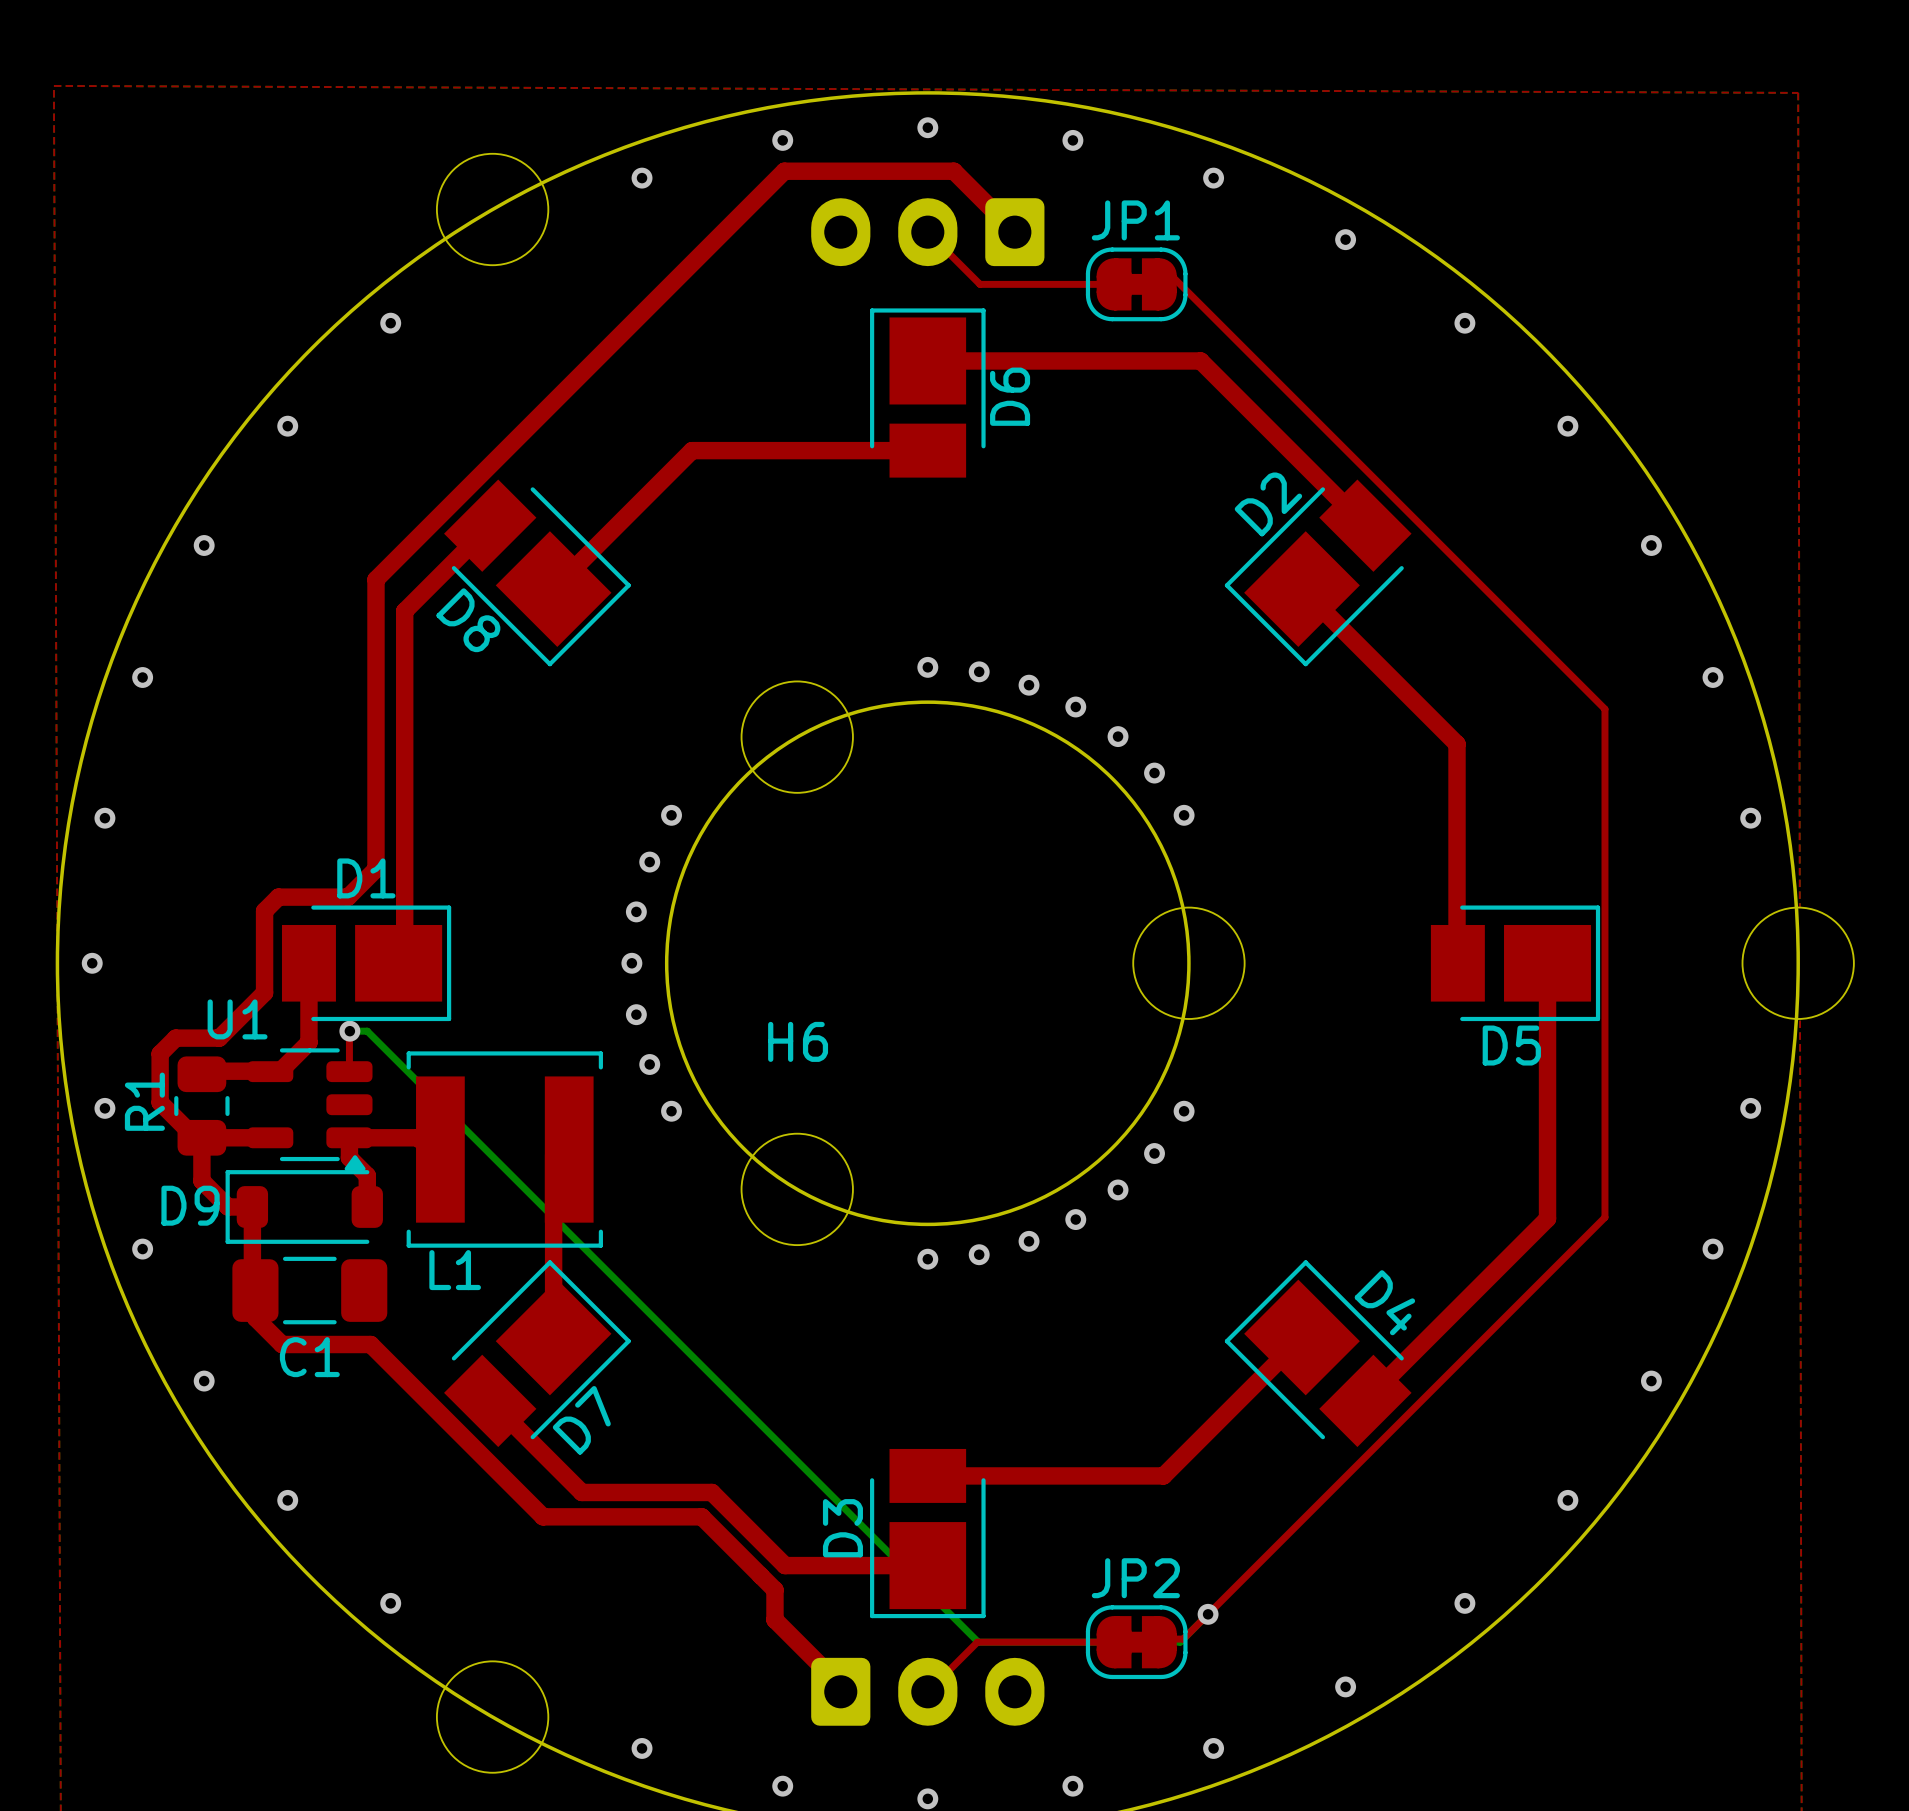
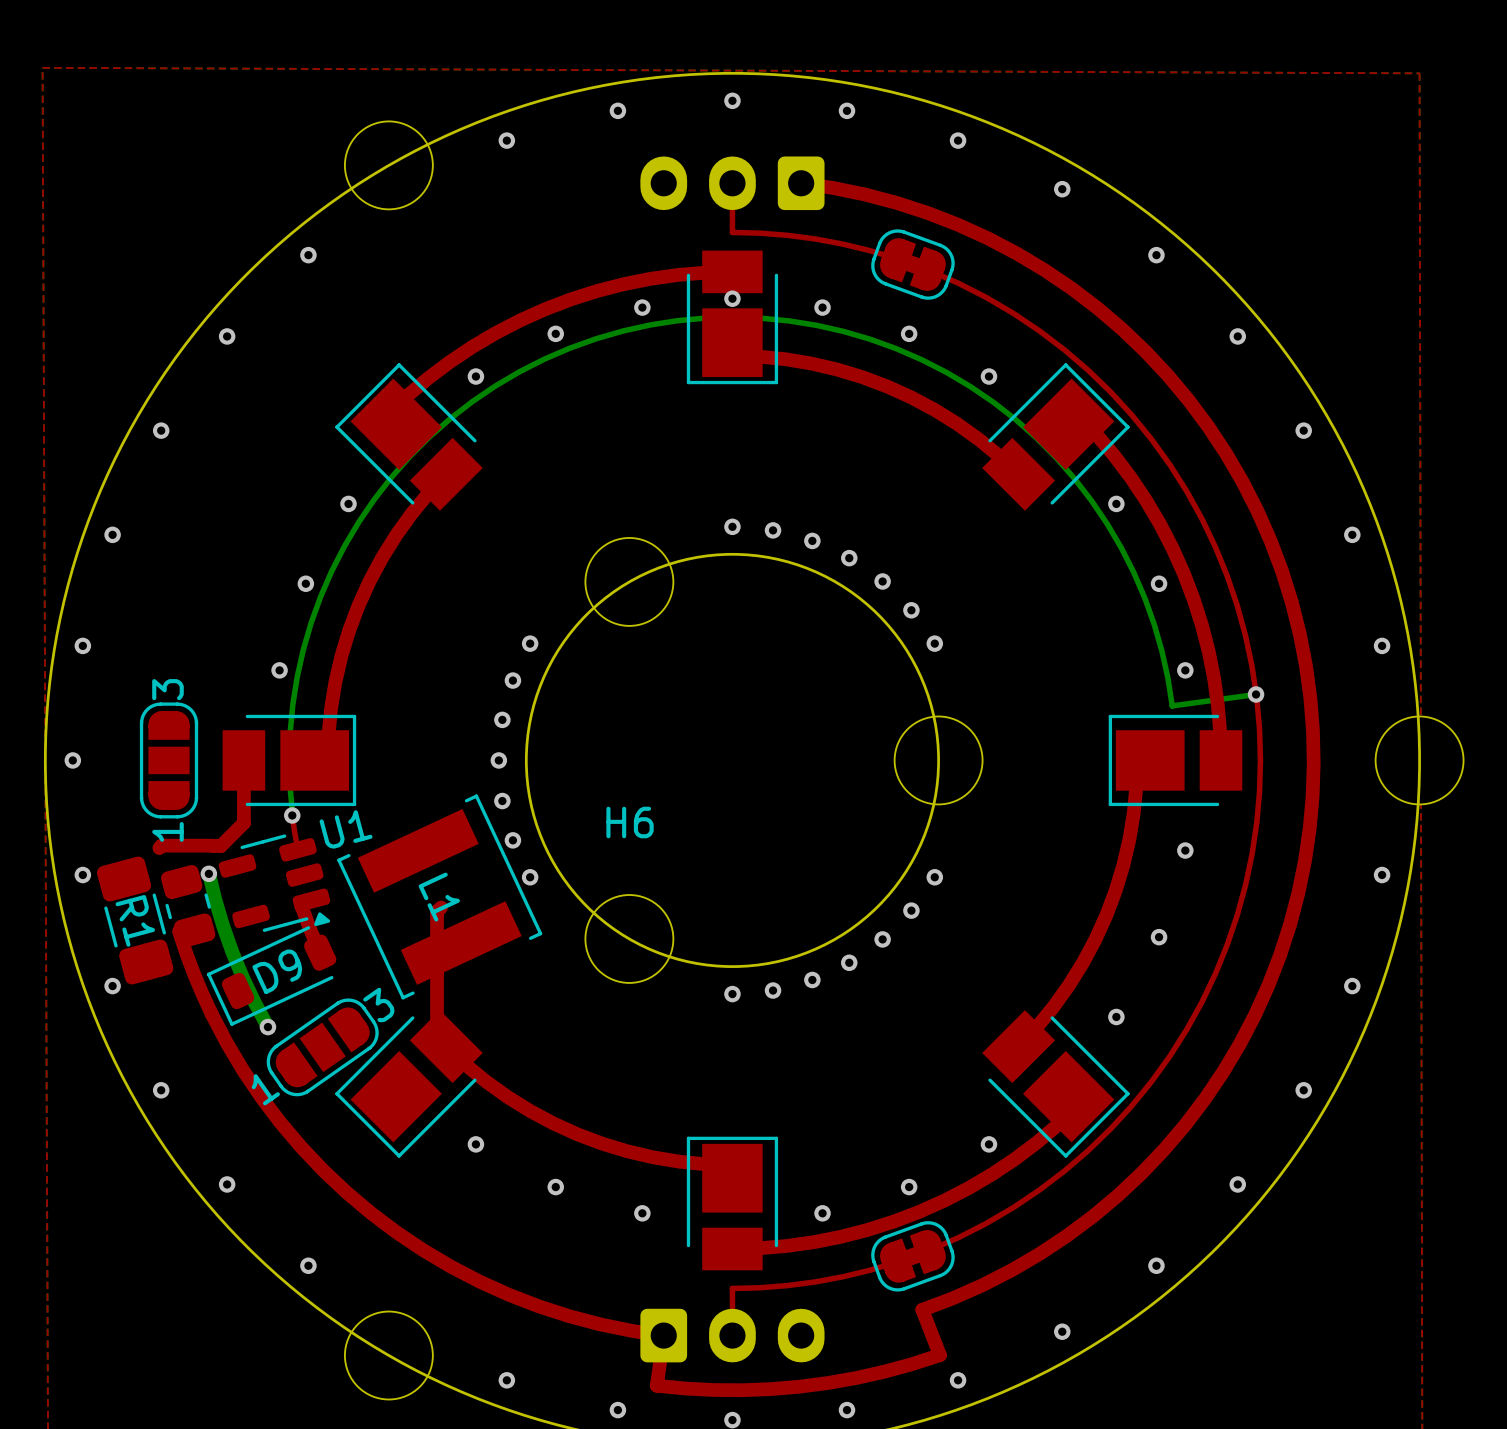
top track: (927, 232) (980, 284) (1114, 284) -> (732, 183) (732, 232) (815, 238) (896, 258)
top track: (1014, 232) (953, 171) (784, 171) (375, 579) (375, 869) (348, 897) (278, 897) (264, 911) (264, 992) (219, 1038) (175, 1038) (160, 1053) (160, 1102) (195, 1137) (270, 1137) -> (801, 183) (865, 194) (927, 212) (987, 238) (1016, 253) (1071, 288) (1122, 329) (1168, 375) (1188, 400) (1226, 453) (1242, 482) (1270, 540) (1291, 602) (1305, 666) (1310, 698) (1313, 763) (1309, 828) (1298, 892) (1280, 954) (1268, 985) (1255, 1015) (1223, 1071) (1185, 1124) (1141, 1173) (1117, 1195) (1066, 1235) (1011, 1270) (982, 1285) (922, 1309) (939, 1355) (884, 1371) (800, 1386) (742, 1390) (656, 1385) (663, 1335) (600, 1324) (569, 1316) (538, 1306) (479, 1281) (451, 1266) (396, 1232) (371, 1213) (323, 1170) (280, 1122) (242, 1070) (226, 1042) (202, 993) (179, 931)
top track: (1159, 277) (1173, 277) (1604, 709) (1604, 1217) (1183, 1639) (1161, 1639) -> none
JP1: (1136, 284) -> none
part: none -> (912, 264)
top track: none -> (929, 270) (986, 297) (1013, 313) (1064, 349) (1110, 392) (1151, 439) (1170, 464) (1201, 518) (1227, 576) (1237, 605) (1252, 666) (1256, 697) (1260, 760) (1256, 823) (1245, 884) (1237, 914) (1215, 973) (1186, 1029) (1170, 1055) (1131, 1105) (1088, 1150) (1064, 1171) (1039, 1190) (986, 1223) (929, 1250)
top track: (927, 360) (1200, 360) (1365, 525) -> (1221, 760) (1220, 733) (1214, 678) (1201, 625) (1183, 573) (1160, 524) (1130, 477) (1096, 434) (1077, 415)
via: none -> (732, 298)
via: none -> (642, 307)
via: none -> (822, 307)
D6: (927, 393) -> none
part: none -> (732, 317)
via: none -> (555, 333)
via: none -> (909, 333)
top track: (927, 450) (692, 450) (553, 589) -> (732, 355) (758, 356) (811, 363) (862, 377) (887, 386) (934, 409) (957, 423) (978, 439) (1018, 474)
via: none -> (475, 376)
via: none -> (988, 376)
top track: (490, 525) (404, 611) (404, 957) -> (387, 415) (406, 396) (449, 362) (496, 332) (545, 309) (597, 291) (650, 278) (705, 272) (732, 271)
part: none -> (409, 437)
part: none -> (1055, 437)
D8: (537, 572) -> none
D2: (1318, 572) -> none
top track: (1302, 589) (1457, 744) (1457, 962) -> none
top track: none -> (446, 474) (411, 514) (395, 535) (381, 558) (358, 605) (349, 630) (335, 681) (328, 733) (327, 760)
via: none -> (348, 503)
via: none -> (1116, 503)
via: none -> (305, 583)
via: none -> (1159, 583)
via: none -> (279, 670)
via: none -> (1185, 670)
D1 name: D1 (366, 878) -> none
bottom track: none -> (1256, 694) (1172, 705) (1161, 651) (1144, 598) (1133, 572) (1107, 523) (1091, 500) (1056, 457) (1015, 419) (970, 386) (946, 372) (896, 348) (870, 339) (816, 325) (761, 318) (733, 317) (677, 320) (622, 331) (596, 338) (570, 348) (519, 371) (472, 401) (450, 418) (409, 456) (374, 499) (344, 546) (331, 571) (311, 622) (303, 649) (292, 704) (290, 732) (290, 787) (292, 815)
via: none -> (1256, 694)
part: none -> (169, 760)
top track: none -> (1137, 760) (1133, 813) (1129, 839) (1115, 890) (1106, 915) (1082, 962) (1068, 985) (1036, 1027) (1018, 1046)
part: none -> (1175, 760)
D5: (1515, 963) -> none
top track: (1547, 963) (1547, 1218) (1365, 1400) -> (732, 1249) (759, 1248) (814, 1242) (867, 1229) (919, 1211) (968, 1188) (1015, 1158) (1037, 1142) (1077, 1105)
U1 name position: U1 (237, 1019) -> U1 (346, 829)
top track: (349, 1031) (349, 1071) -> none
bottom track: (349, 1031) (367, 1031) (978, 1642) (1180, 1642) (1208, 1614) -> none
via position: (349, 1031) -> (292, 815)
top track: none -> (292, 815) (297, 849)
via: none -> (1185, 850)
R1 rotation: 0° (201, 1106) -> 15° counterclockwise (188, 906)
bottom track: none -> (208, 873) (232, 952) (267, 1027)
via: none -> (208, 873)
U1 rotation: 0° (309, 1109) -> 15° counterclockwise (274, 883)
top track: (201, 1137) (201, 1180) (228, 1206) (252, 1206) (252, 1287) (255, 1290) (255, 1317) (281, 1344) (370, 1344) (543, 1516) (701, 1516) (774, 1589) (774, 1619) (840, 1685) -> none
top track: none -> (300, 903) (320, 952)
top track: (429, 1149) (418, 1137) (349, 1137) (349, 1157) (367, 1175) (367, 1206) -> none
L1 rotation: 0° (504, 1149) -> 65° clockwise (439, 896)
part: none -> (135, 920)
via: none -> (1159, 937)
D9 name position: D9 (190, 1205) -> D9 (277, 971)
D9 rotation: 0° (304, 1206) -> 25° counterclockwise (271, 975)
L1 name position: L1 (455, 1270) -> L1 (439, 897)
via: none -> (1116, 1016)
C1: (309, 1290) -> none
via: none -> (267, 1027)
part: none -> (322, 1047)
top track: (1302, 1337) (1163, 1475) (927, 1475) -> (446, 1046) (486, 1081) (507, 1096) (530, 1110) (577, 1134) (602, 1143) (653, 1157) (679, 1161) (732, 1165)
D7: (537, 1353) -> none
D4: (1318, 1353) -> none
part: none -> (409, 1083)
part: none -> (1055, 1083)
top track: (490, 1400) (581, 1492) (711, 1492) (785, 1565) (927, 1565) -> none
via: none -> (475, 1144)
via: none -> (988, 1144)
via: none -> (555, 1187)
via: none -> (909, 1187)
part: none -> (732, 1203)
D3: (927, 1533) -> none
via: none -> (642, 1213)
via: none -> (822, 1213)
part: none -> (912, 1256)
via: (1208, 1614) -> none
top track: (1113, 1642) (977, 1642) (927, 1691) -> (896, 1262) (815, 1281) (732, 1288) (732, 1335)
JP2: (1136, 1642) -> none

